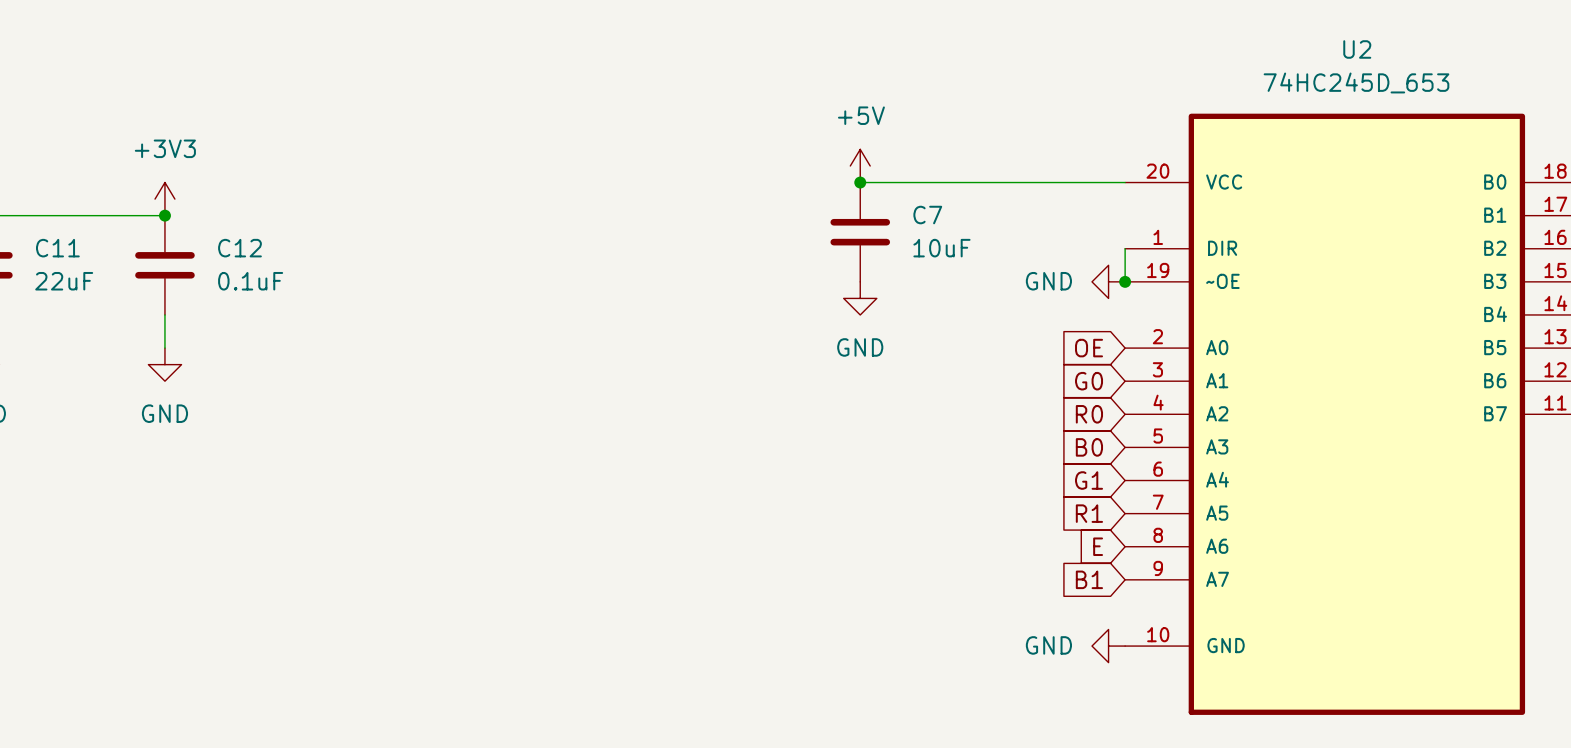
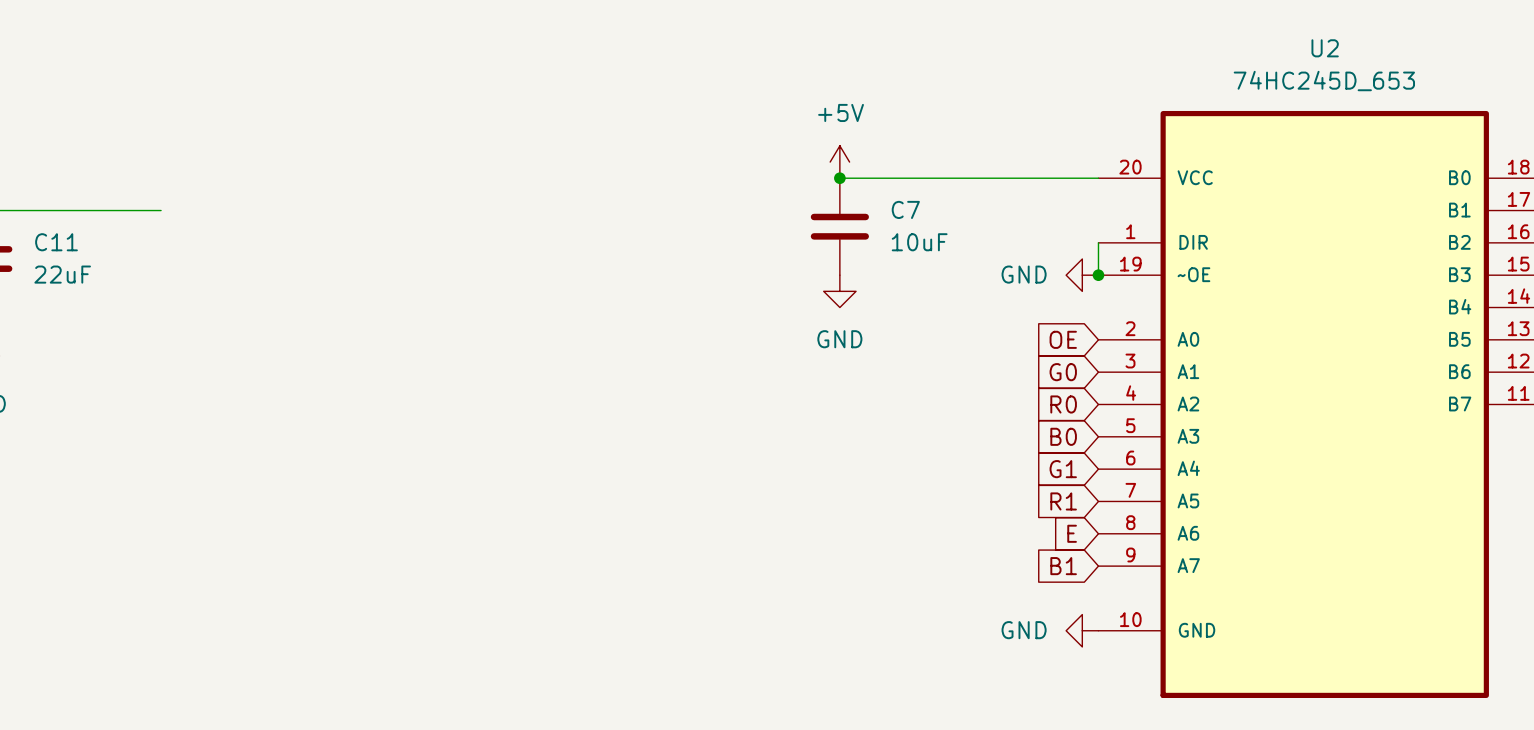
power symbol: +3V3 (164, 199) -> none
junction: (164, 215) -> none
C12: 0.1uF (164, 265) -> none
wire: (164, 314) (164, 348) -> none
power symbol: GND (164, 364) -> none

